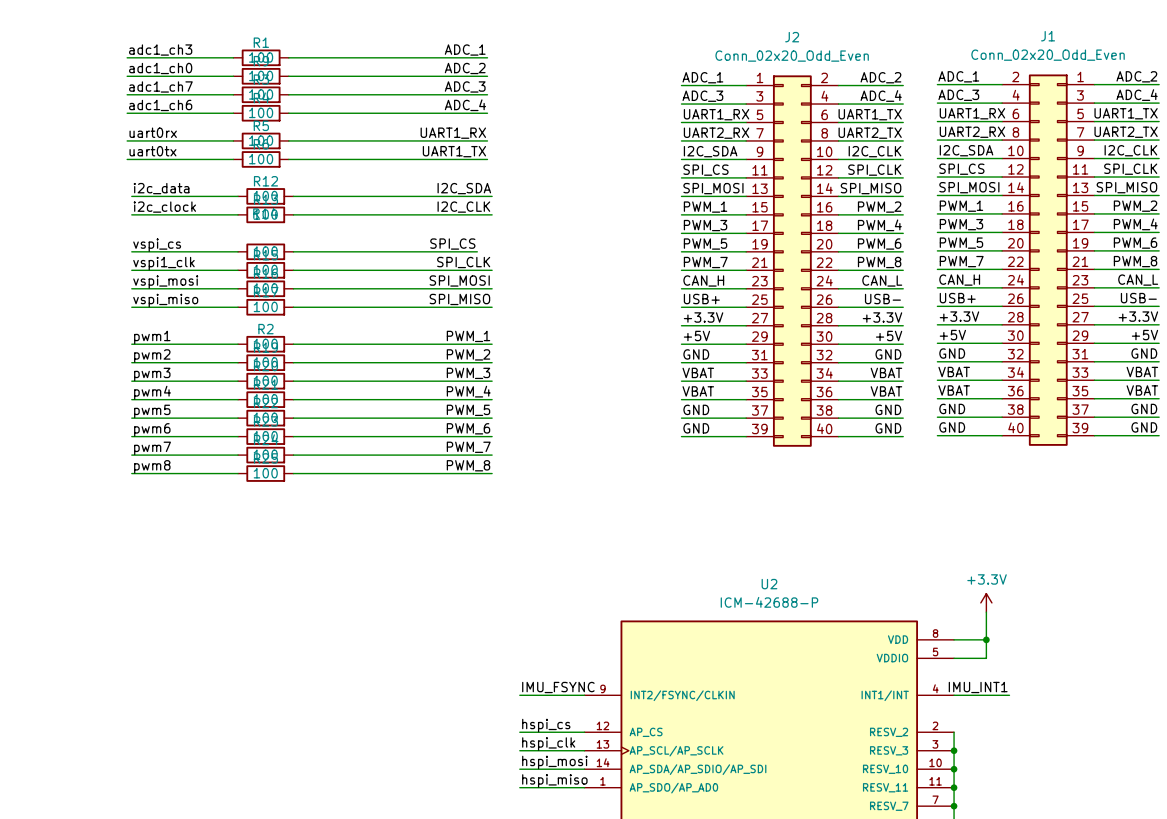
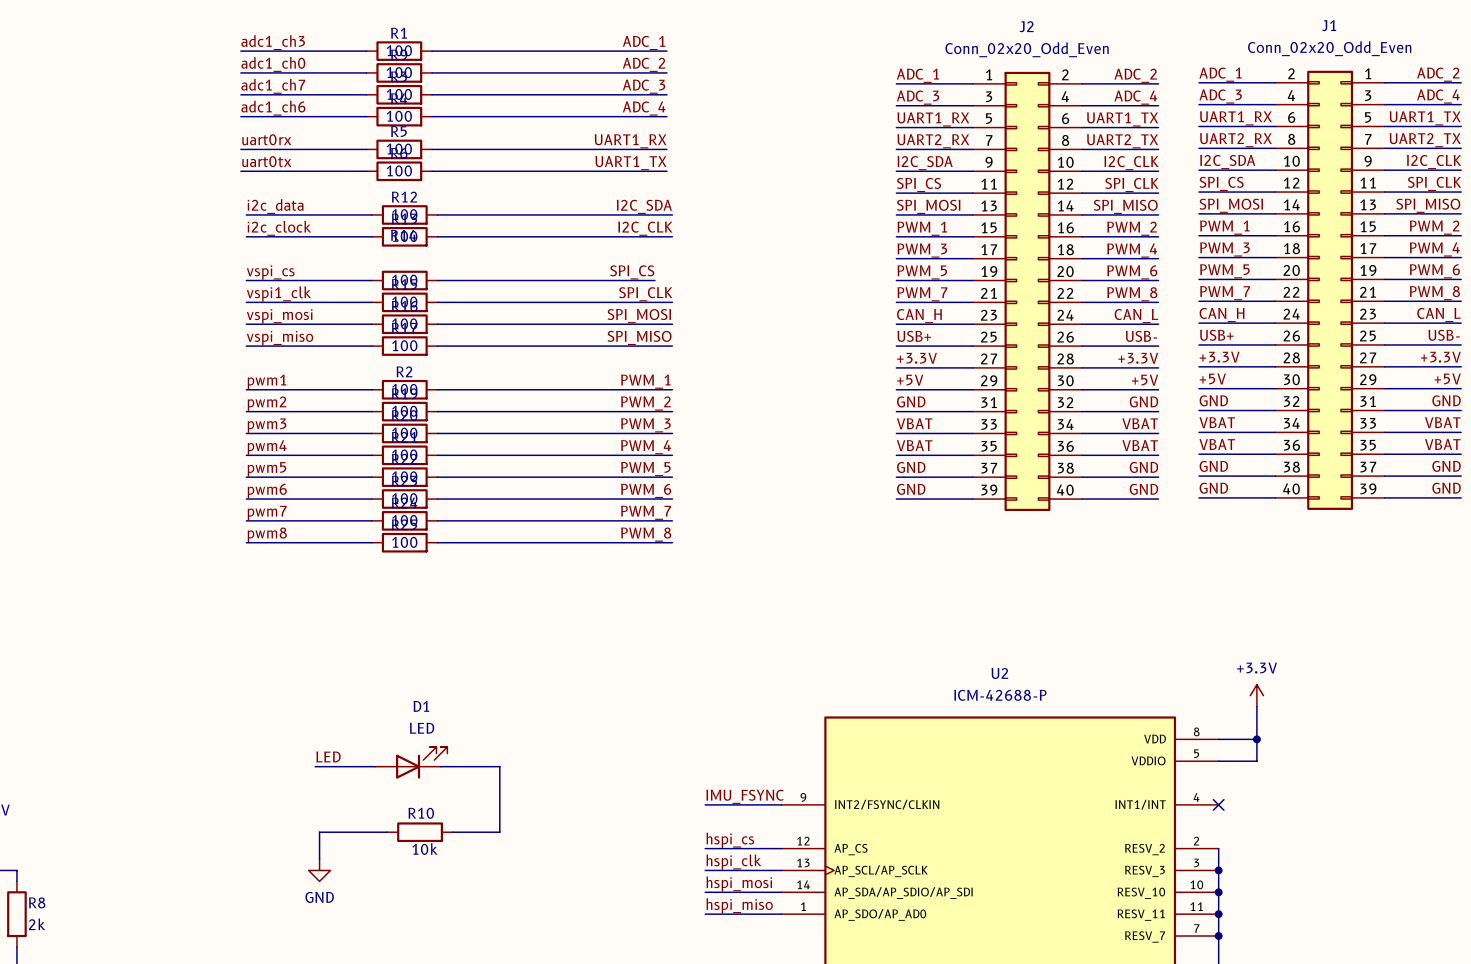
label: none -> LED (328, 756)
D1: none -> LED (411, 762)
wire: none -> (315, 766) (375, 766)
wire: none -> (440, 766) (499, 766) (499, 832) (452, 832)
label: IMU_INT1 (978, 687) -> none
wire: (954, 695) (1009, 695) -> none
no-connect mark: none -> (1218, 804)
wire: none -> (387, 832) (319, 832) (319, 859)
R10: none -> 10k (420, 832)
power symbol: none -> GND (319, 870)

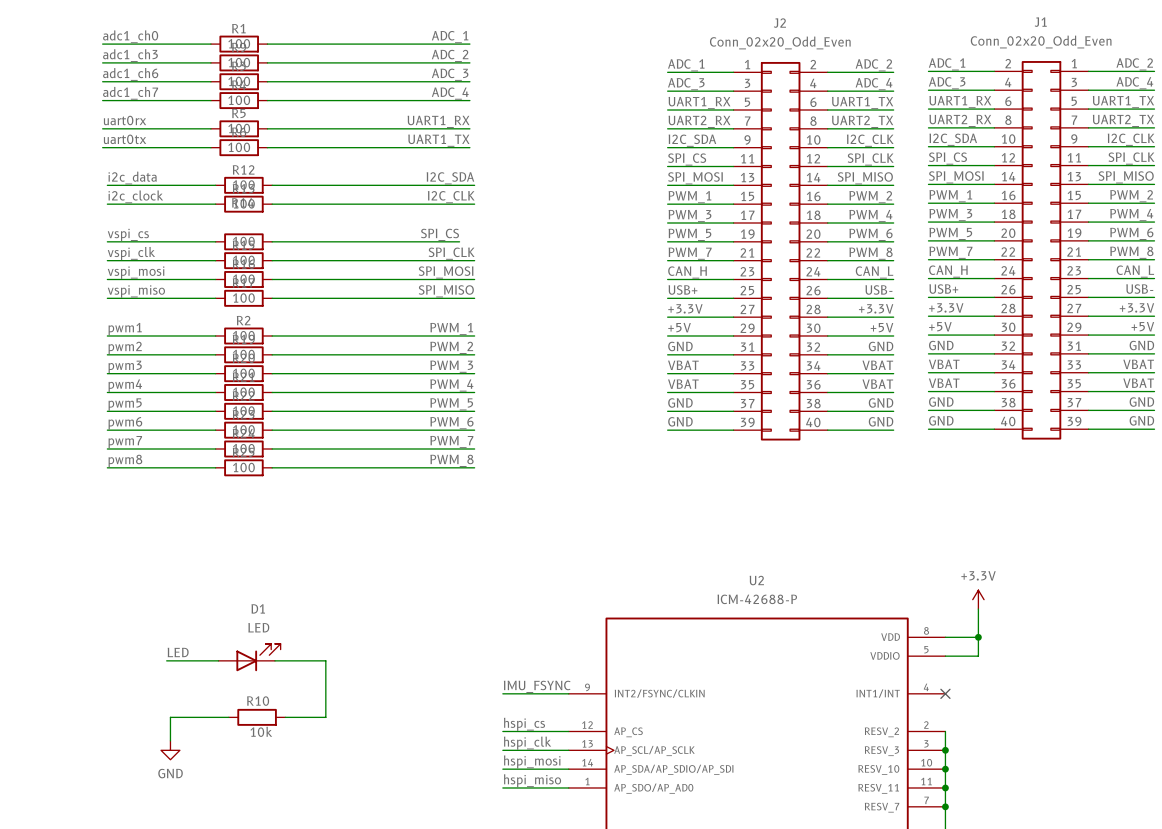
label: adc1_ch3 (273, 42) -> adc1_ch0 (130, 36)
label: adc1_ch0 (273, 64) -> adc1_ch3 (130, 55)
label: adc1_ch7 (273, 86) -> adc1_ch6 (130, 74)
label: adc1_ch6 (273, 108) -> adc1_ch7 (130, 93)
label: vspi1_clk (278, 294) -> vspi_clk (131, 253)

